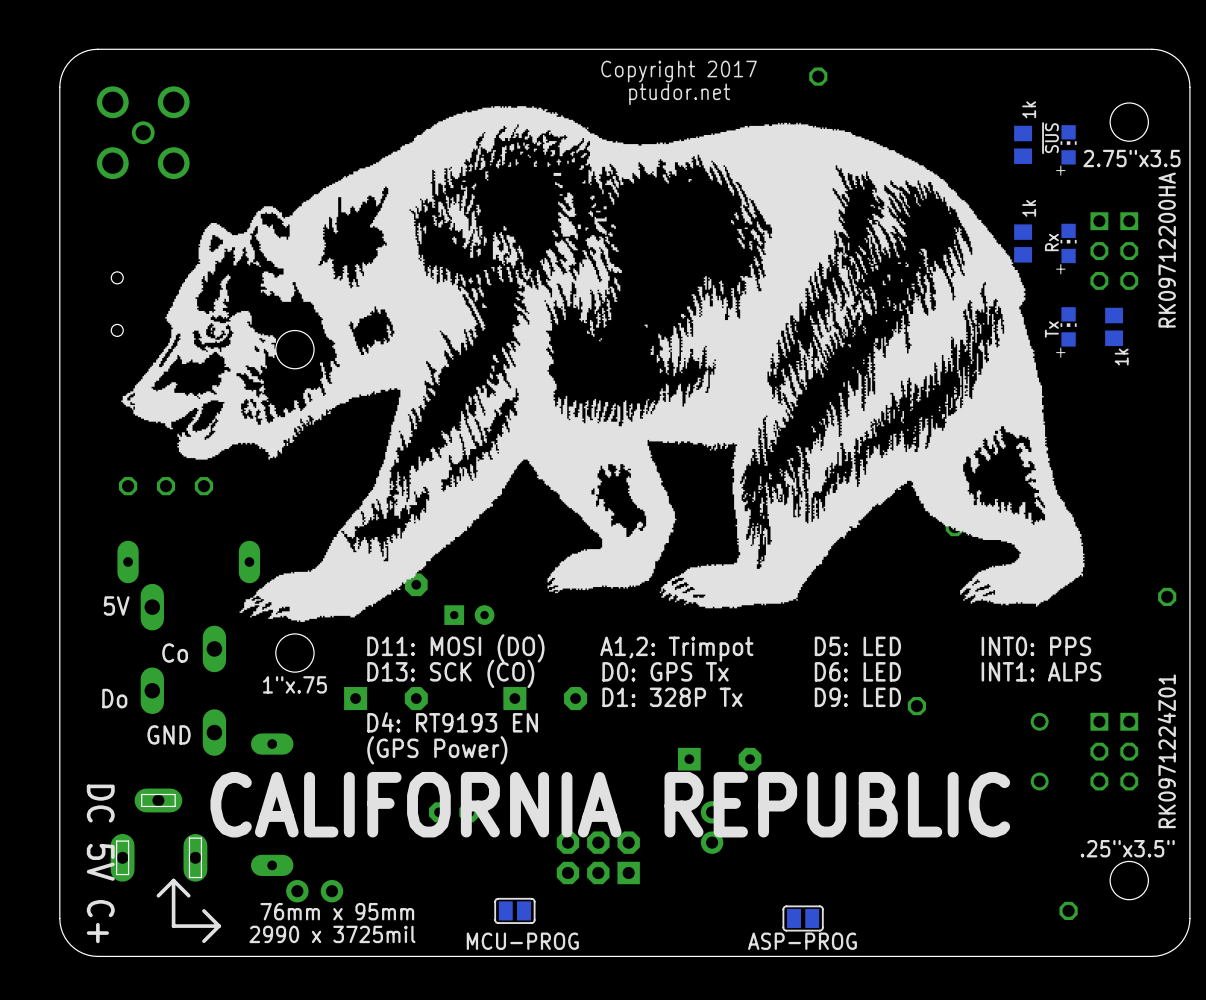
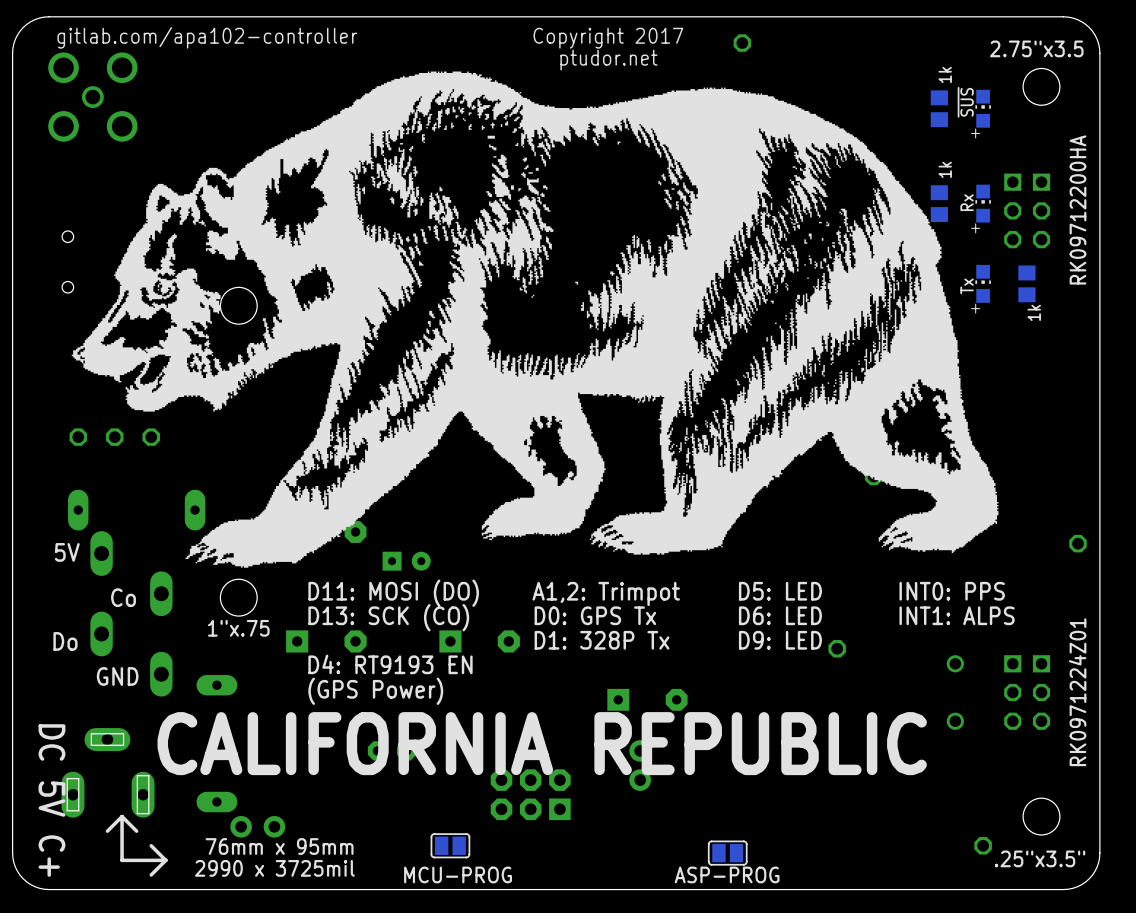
text: none -> gitlab.com/apa102-controller (207, 37)
text position: 2.75"x3.5 (1131, 158) -> 2.75"x3.5 (1036, 48)
text position: .25"x3.5" (1127, 848) -> .25"x3.5" (1040, 858)

